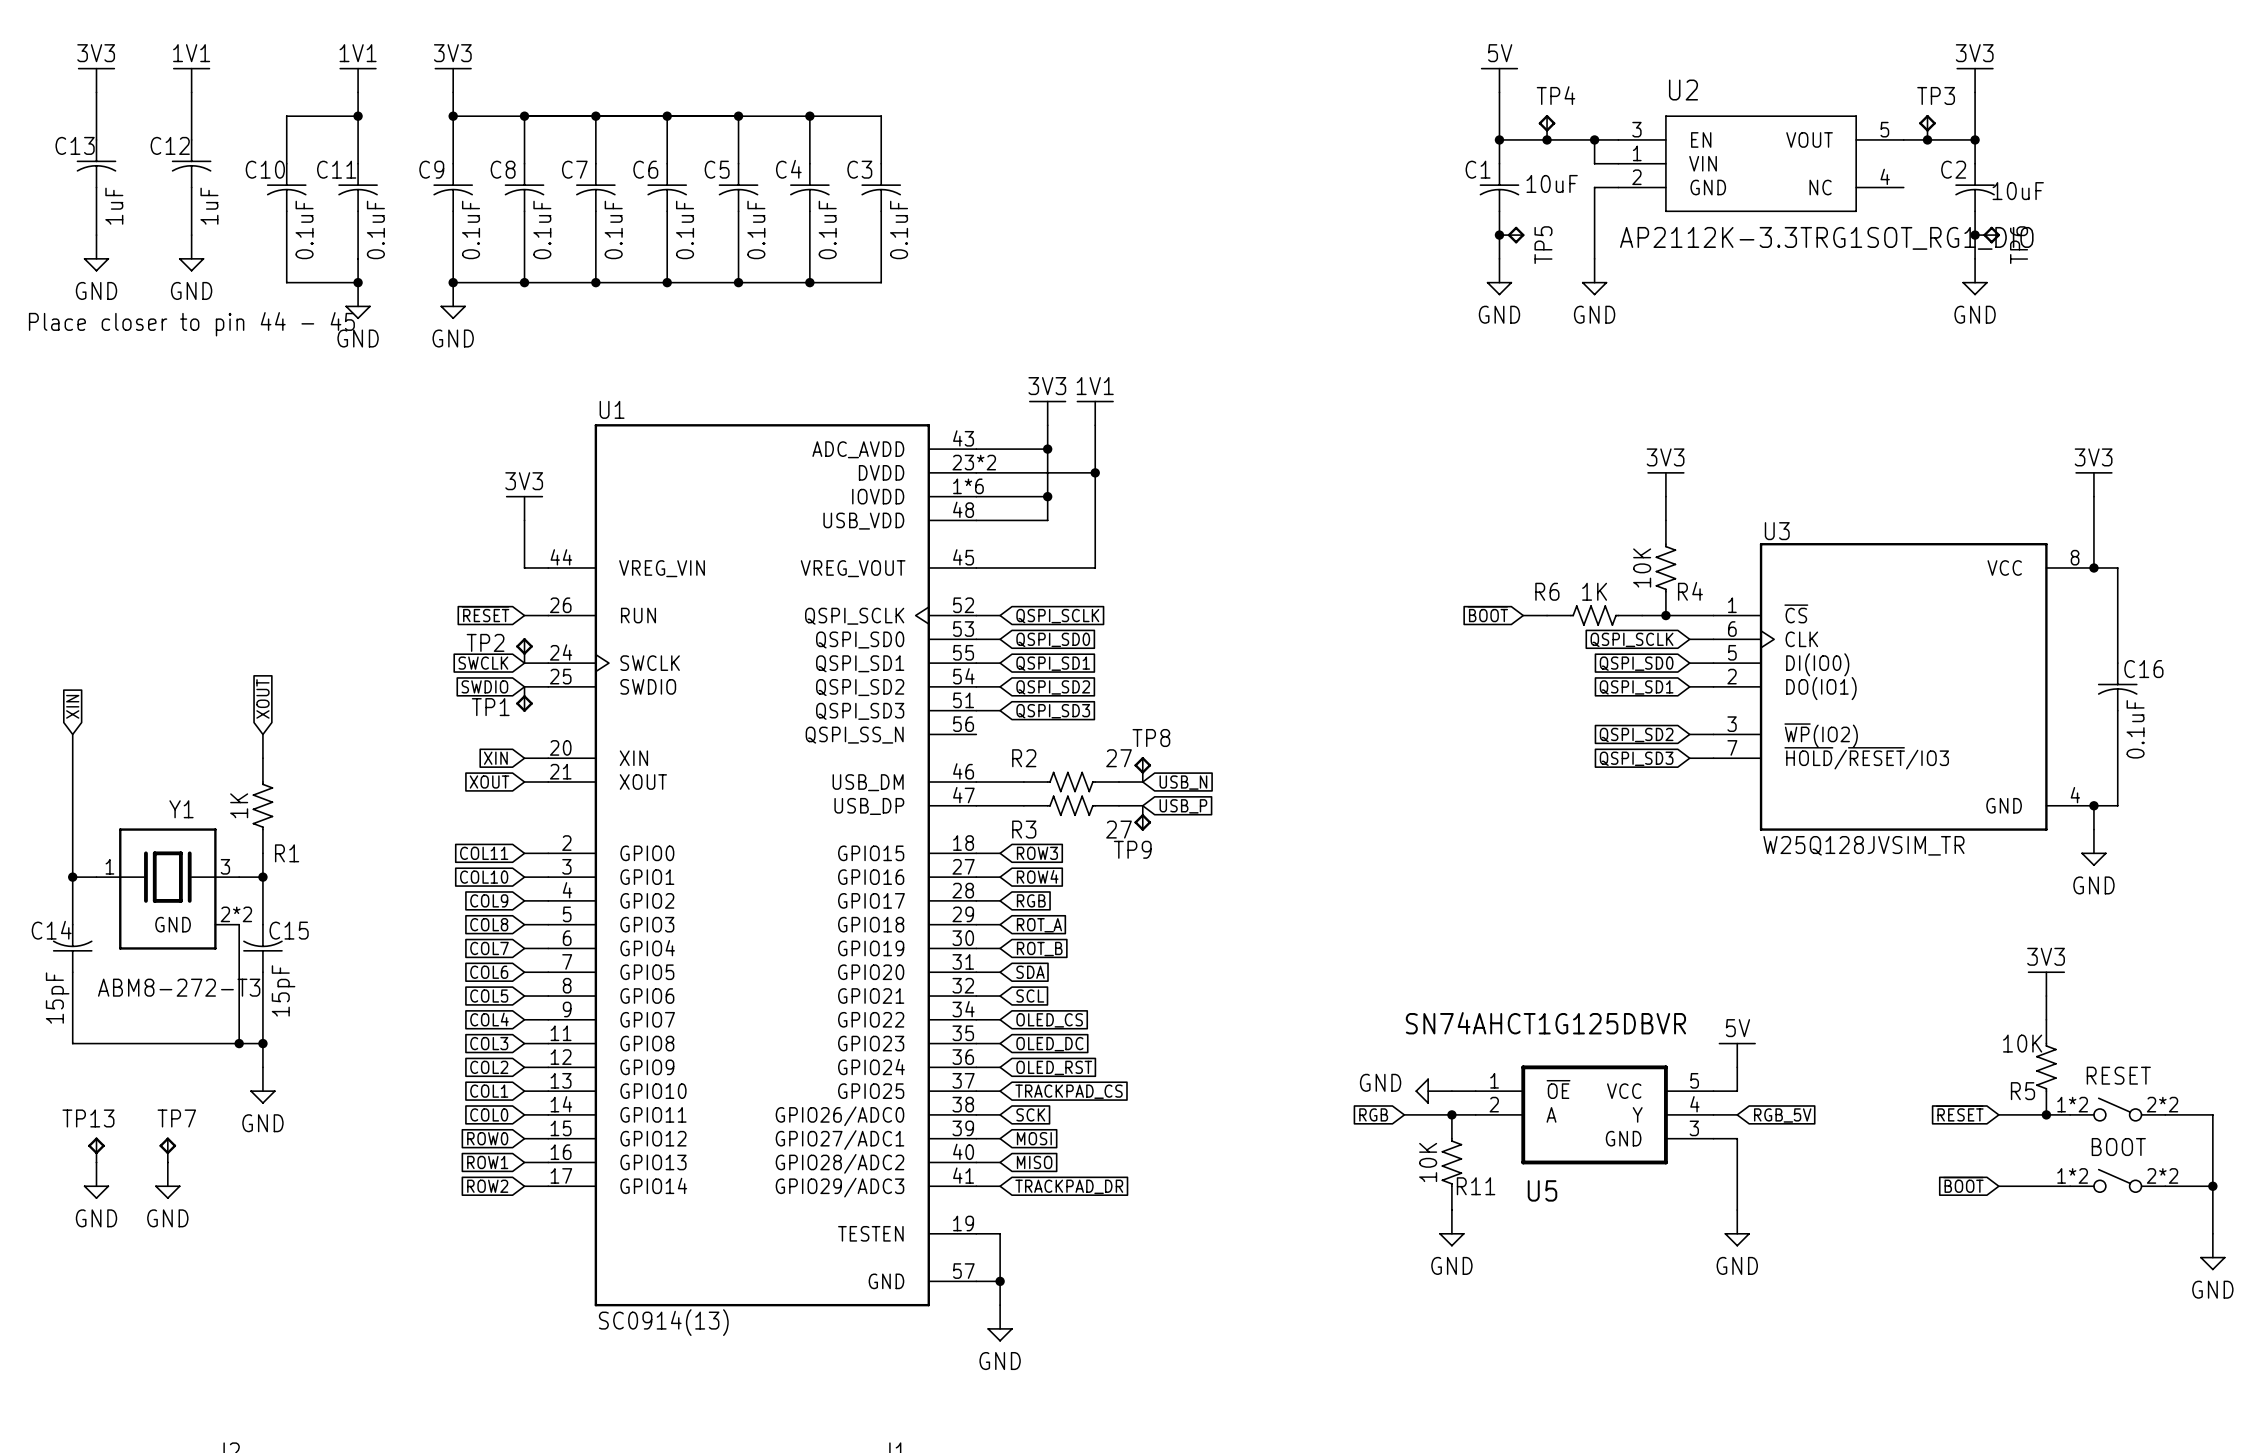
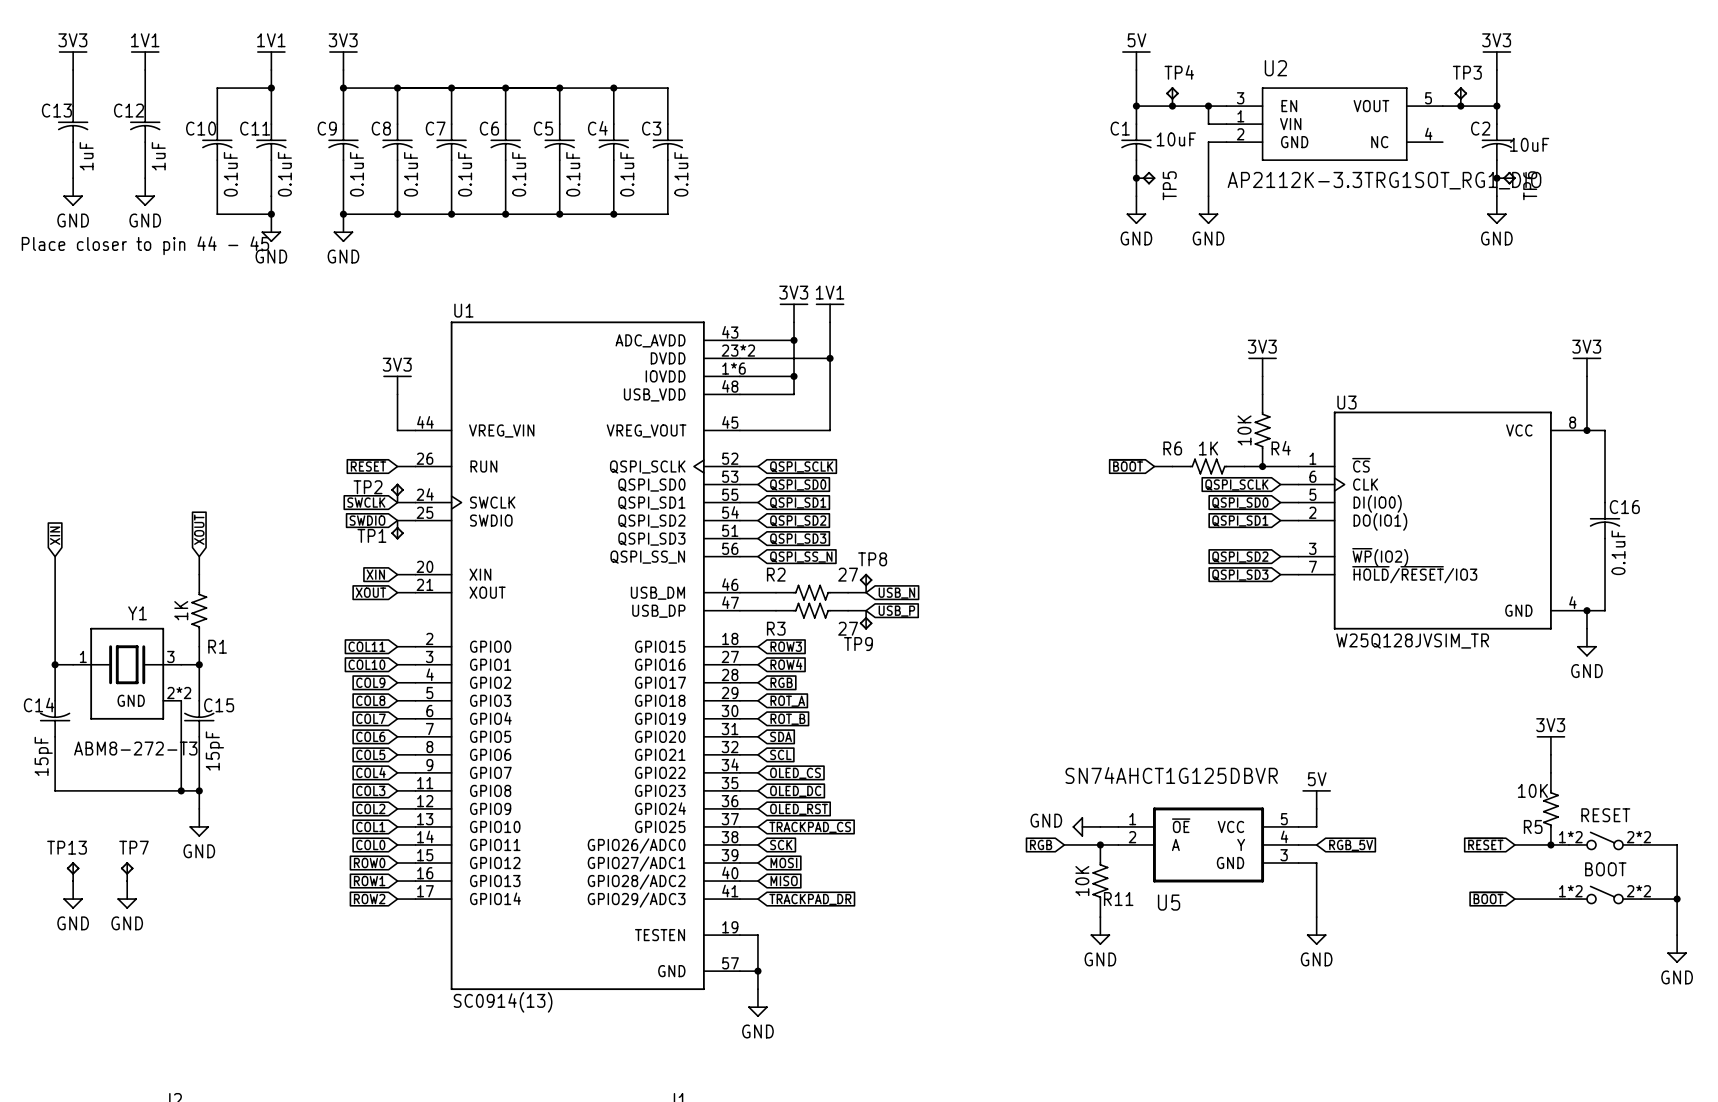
wire: none -> (739, 556) (757, 556)
global label: none -> QSPI_SS_N (801, 557)

